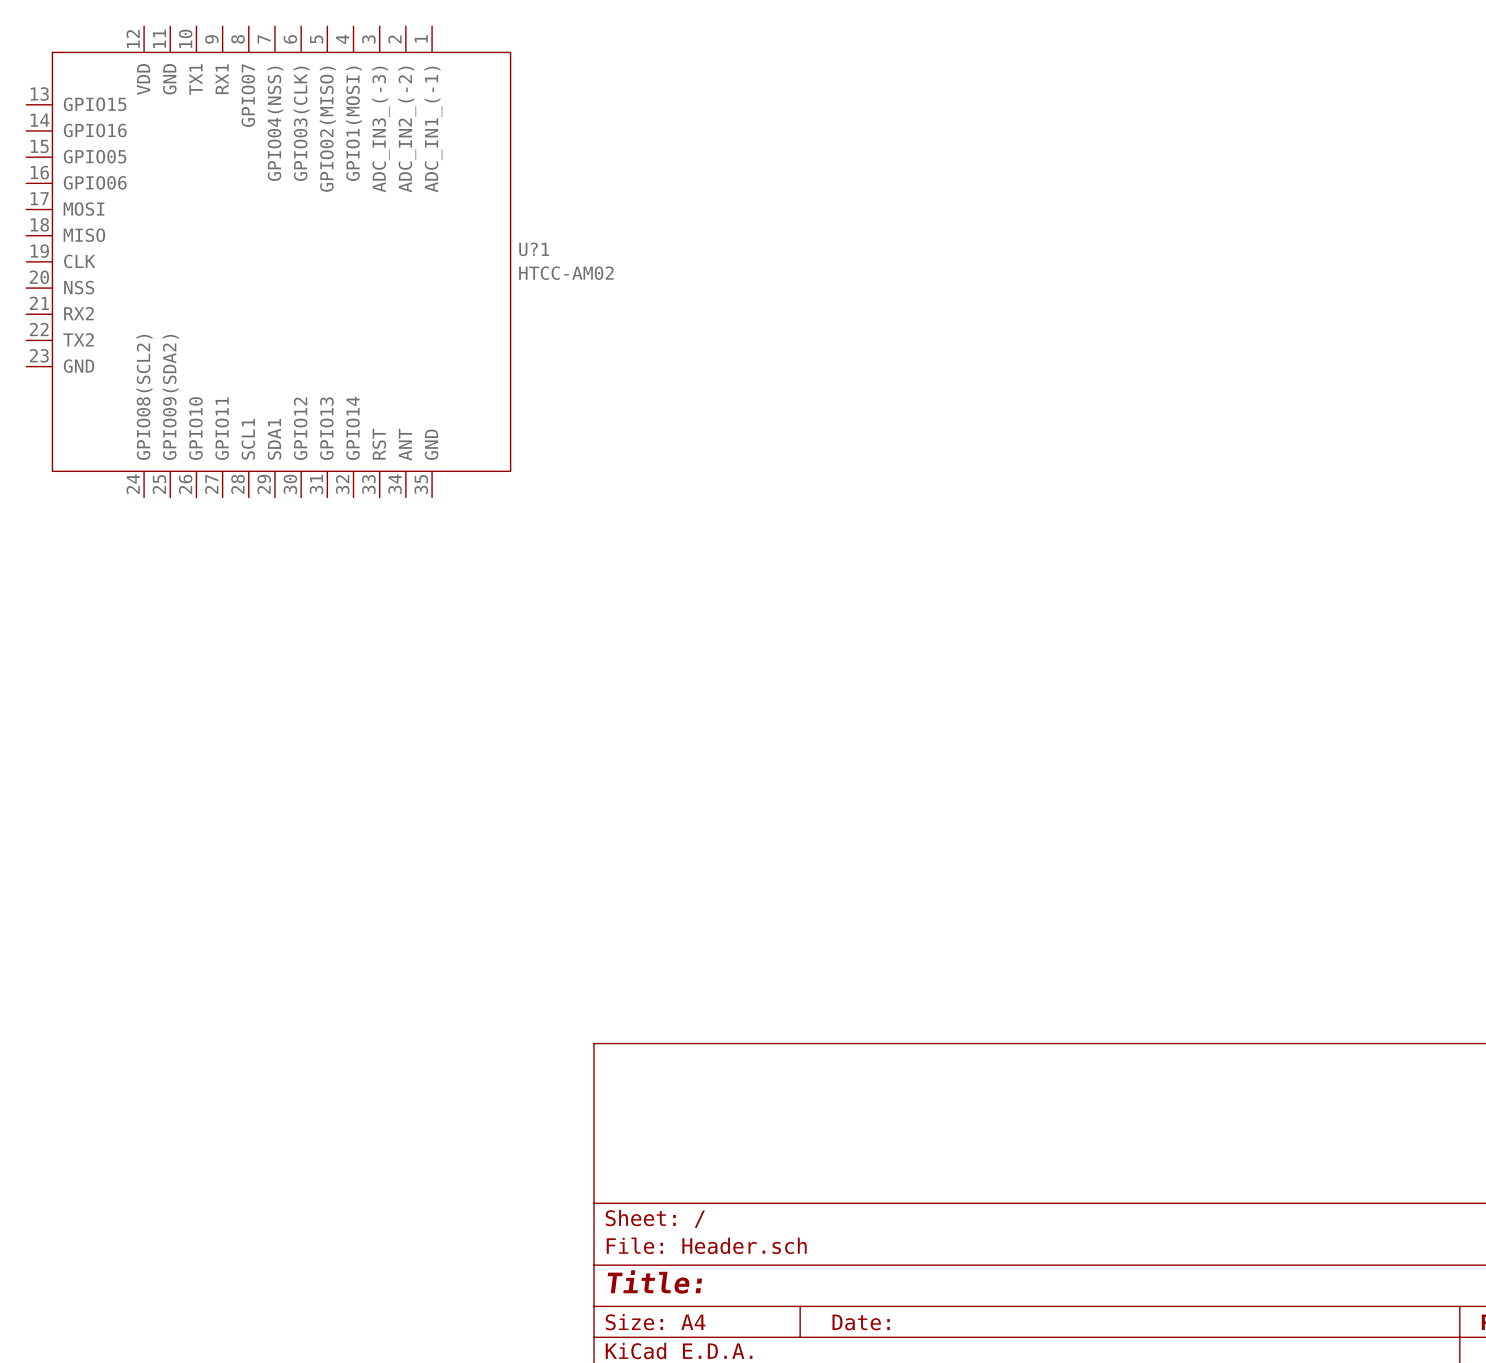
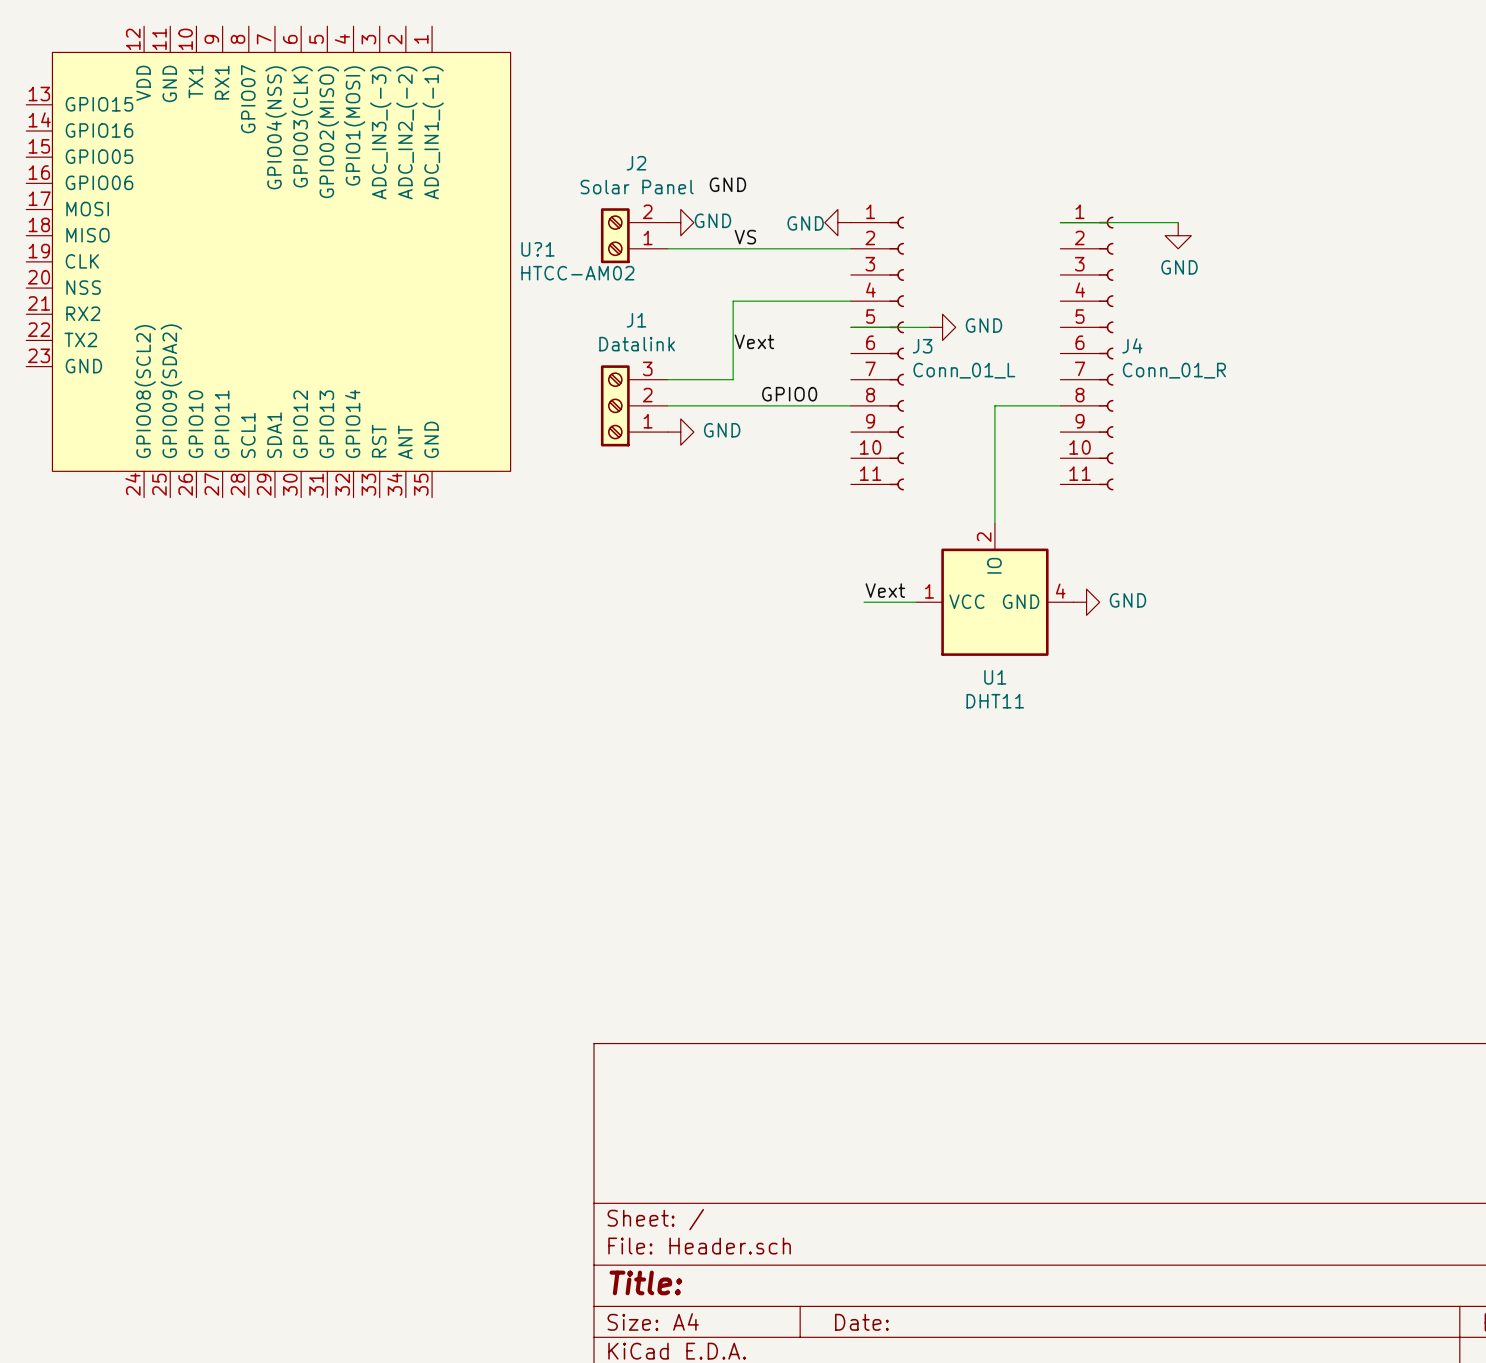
label: none -> GND (727, 184)
power symbol: none -> GND (680, 222)
power symbol: none -> GND (837, 222)
wire: none -> (1060, 222) (1178, 222)
J2: none -> Solar Panel (634, 235)
power symbol: none -> GND (1178, 235)
label: none -> VS (745, 237)
wire: none -> (667, 248) (850, 248)
wire: none -> (850, 301) (733, 301) (733, 379) (667, 379)
wire: none -> (850, 327) (929, 327)
power symbol: none -> GND (942, 327)
label: none -> Vext (754, 341)
J3: none -> Conn_01_L (877, 353)
J4: none -> Conn_01_R (1086, 353)
label: none -> GPIO0 (789, 394)
J1: none -> Datalink (634, 405)
wire: none -> (667, 405) (850, 405)
wire: none -> (1060, 405) (994, 405) (994, 523)
power symbol: none -> GND (680, 432)
U1: none -> DHT11 (994, 589)
label: none -> Vext (885, 590)
wire: none -> (864, 602) (916, 602)
power symbol: none -> GND (1086, 602)

